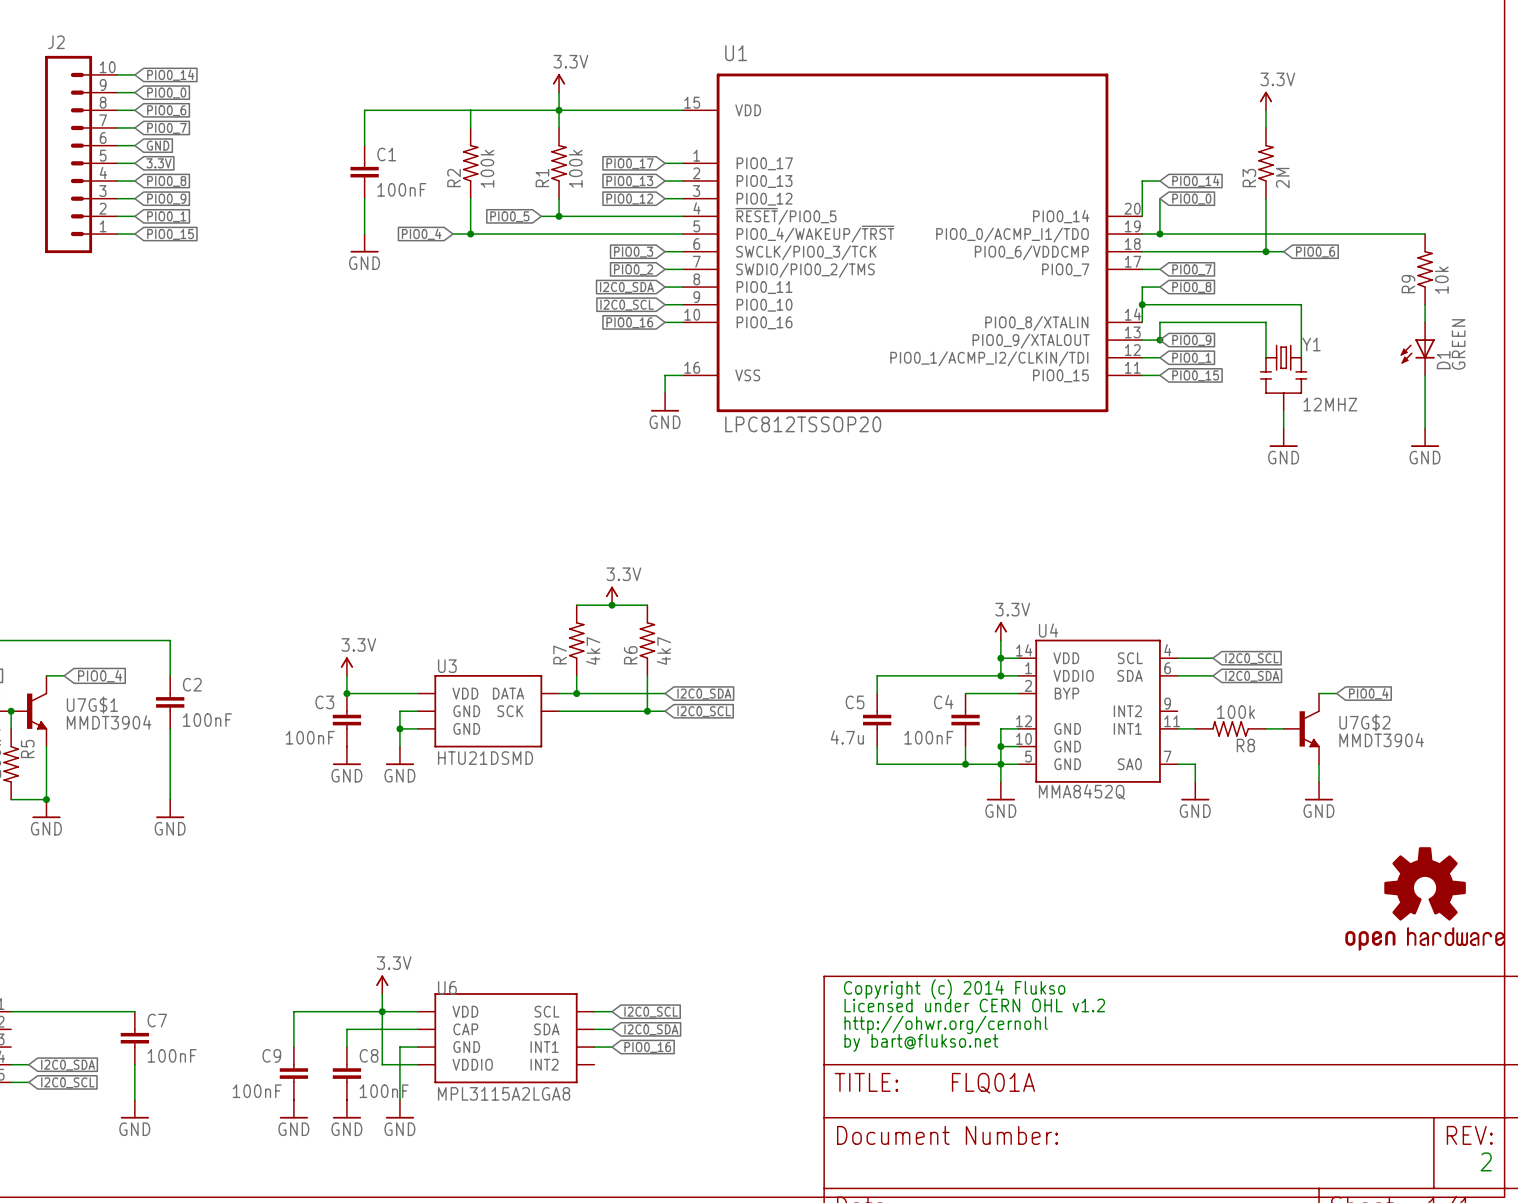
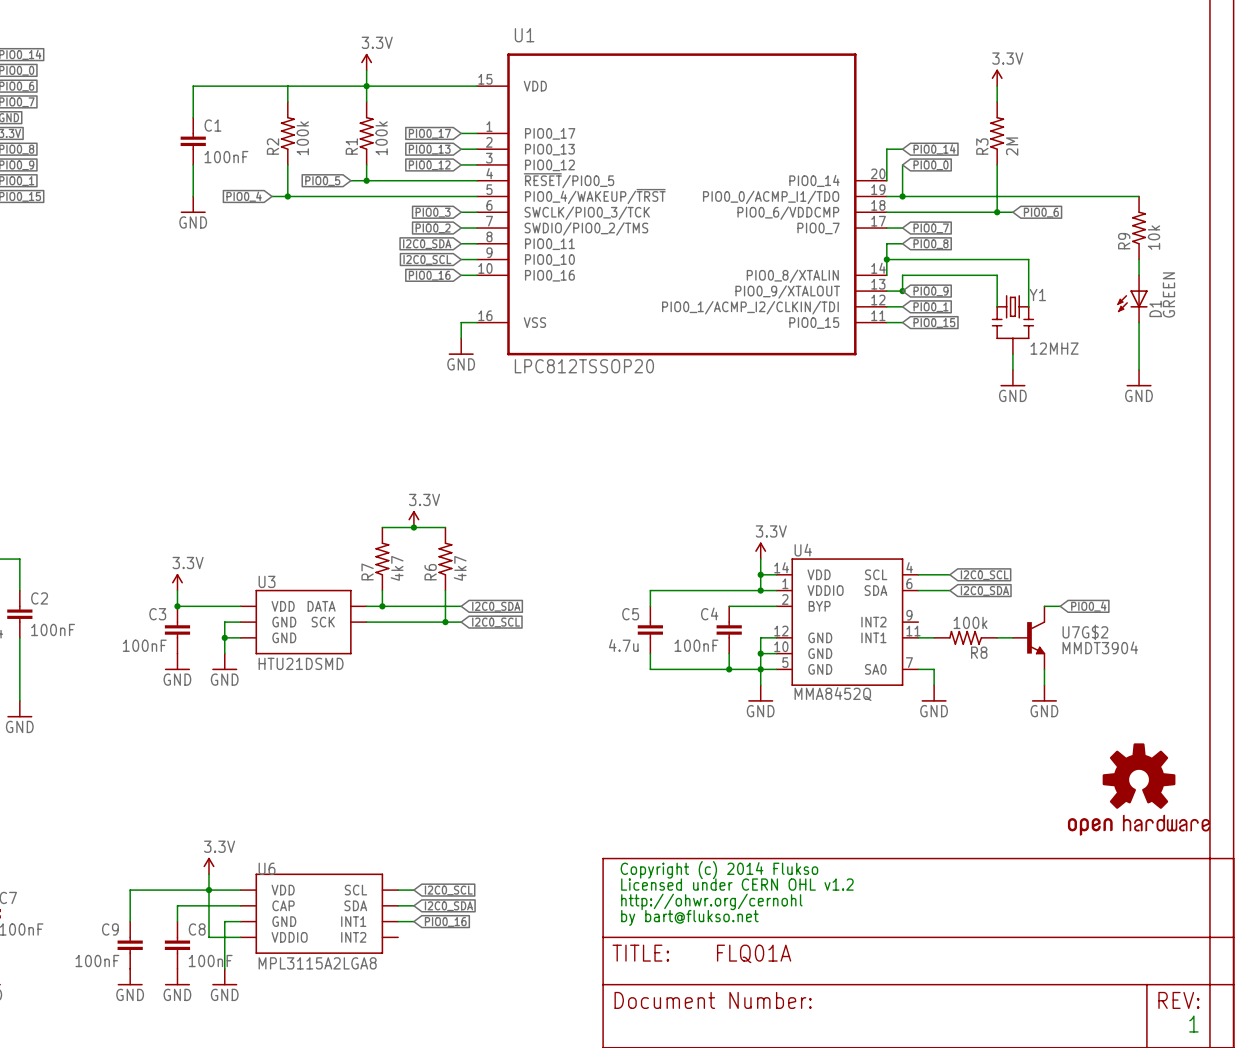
text: 2 (1486, 1161) -> 1 (1193, 1024)

